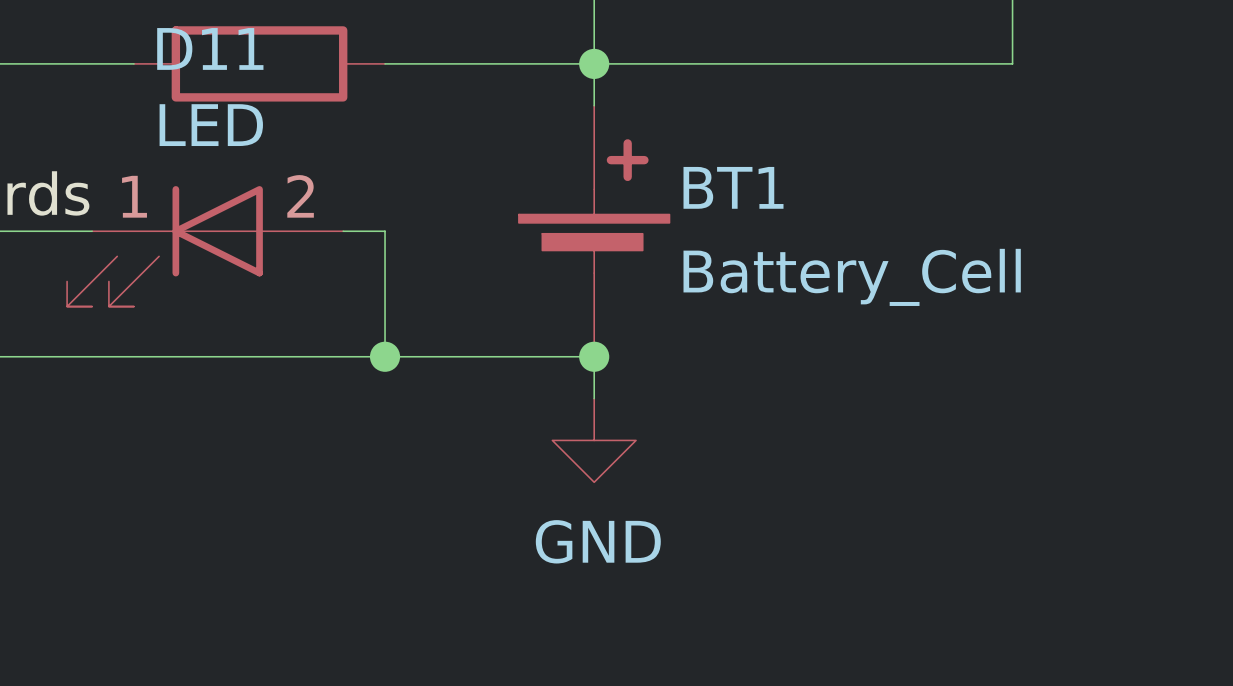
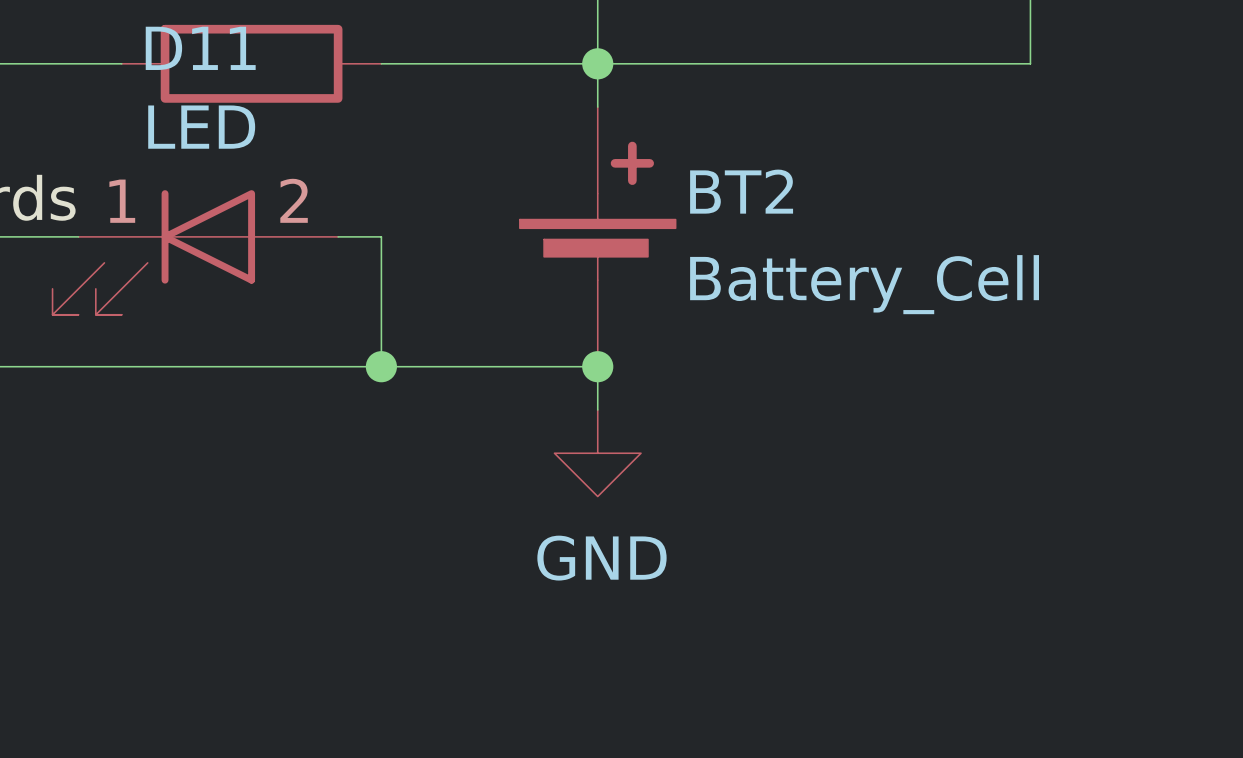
BT1 name: BT1 (733, 187) -> BT2 (741, 191)

